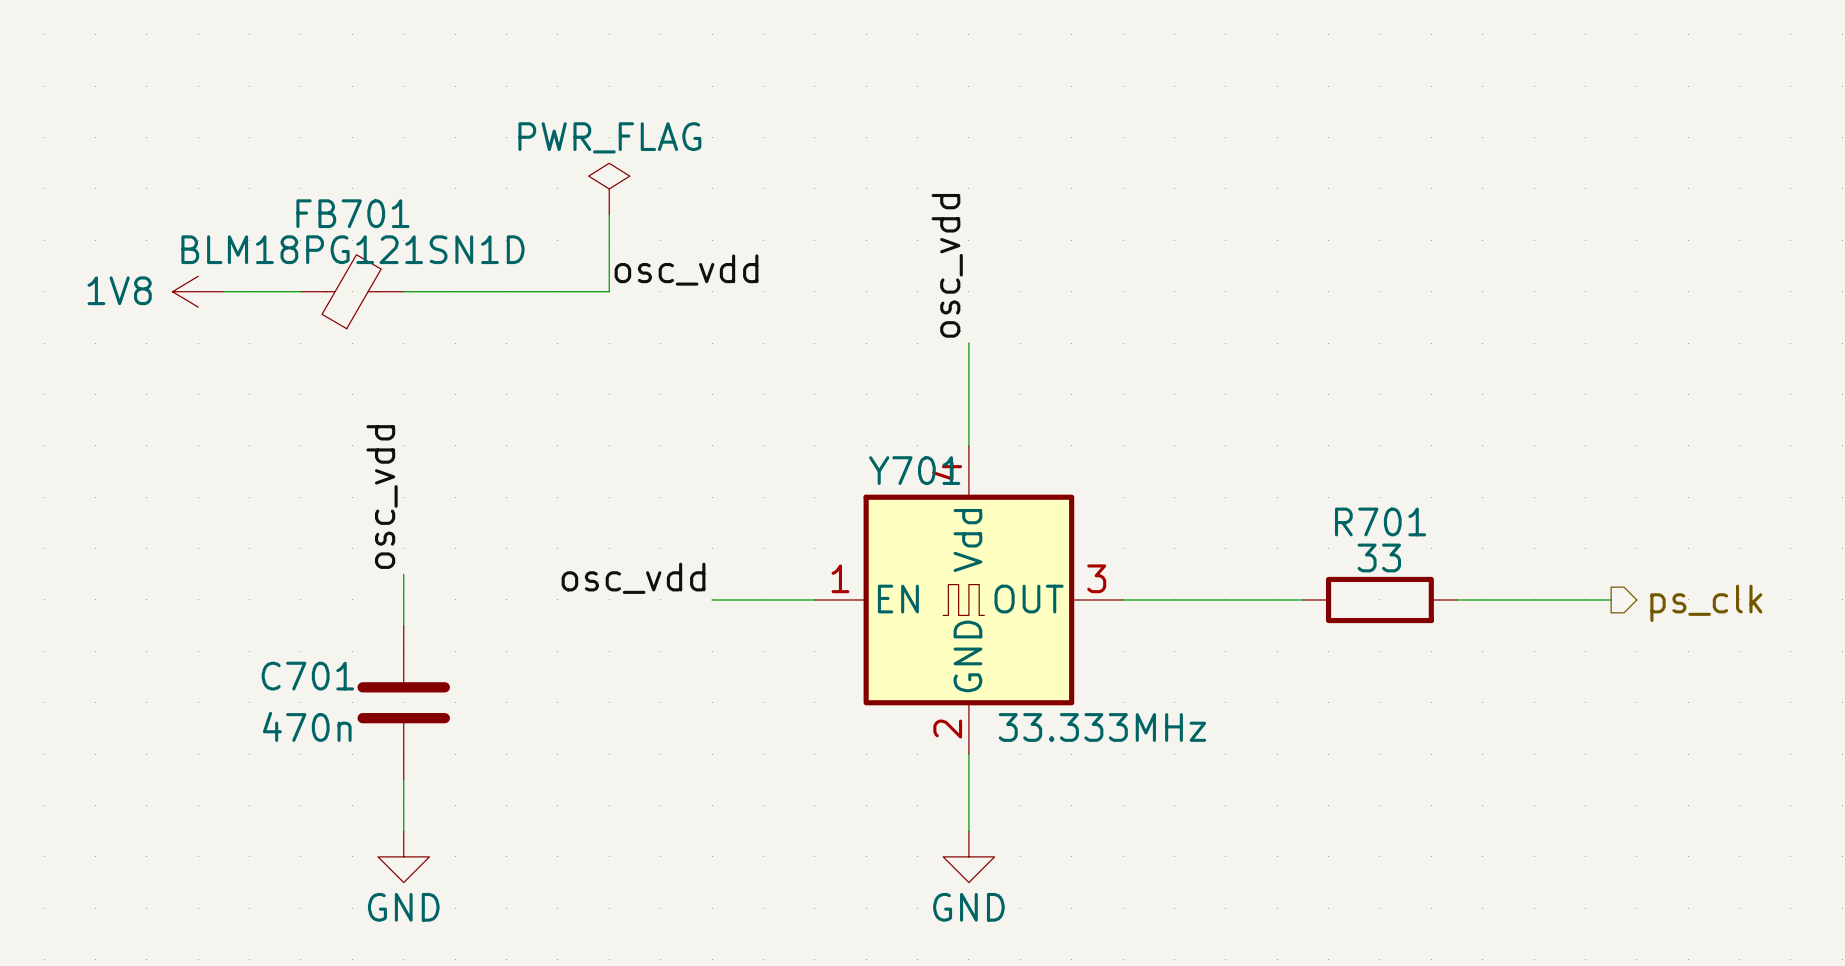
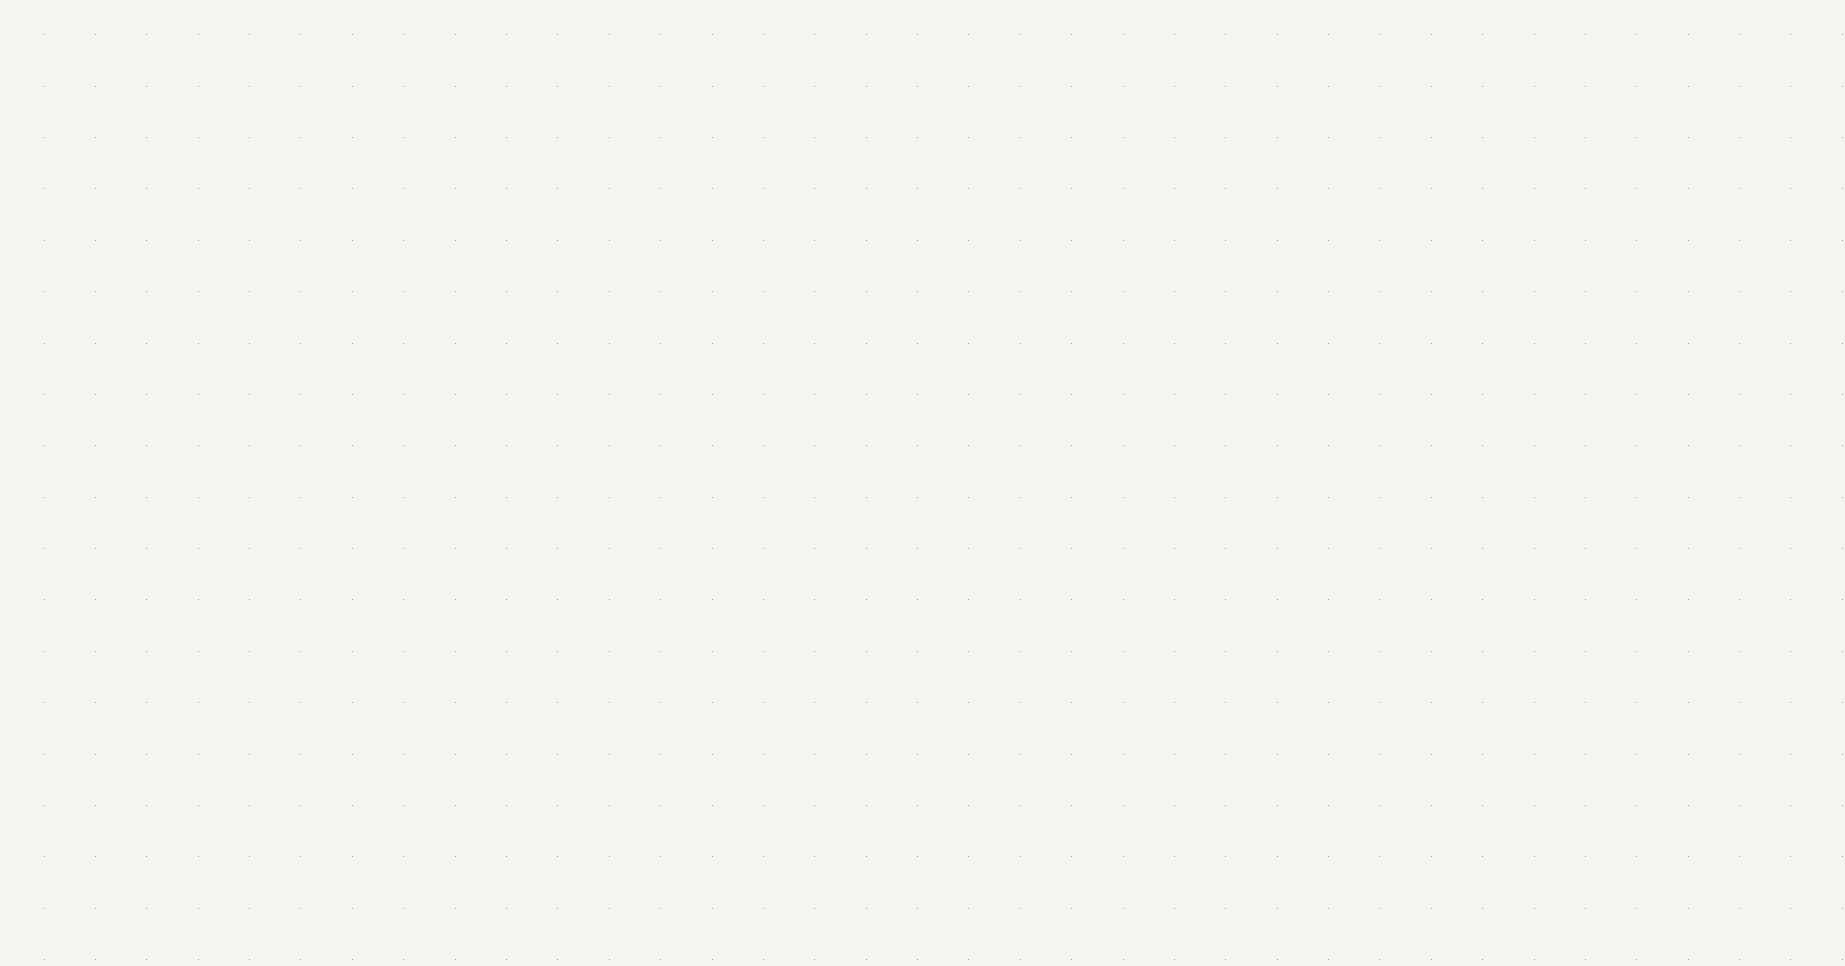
power symbol: PWR_FLAG (609, 188) -> none
wire: (609, 214) (609, 291) (403, 291) -> none
label: osc_vdd (947, 265) -> none
label: osc_vdd (686, 270) -> none
power symbol: 1V8 (198, 291) -> none
wire: (223, 291) (300, 291) -> none
FB701: BLM18PG121SN1D (352, 291) -> none
wire: (968, 343) (968, 445) -> none
label: osc_vdd (382, 497) -> none
wire: (403, 574) (403, 625) -> none
label: osc_vdd (633, 578) -> none
wire: (712, 599) (814, 599) -> none
Y701: 33.333MHz (968, 599) -> none
wire: (1123, 599) (1302, 599) -> none
R701: 33 (1379, 599) -> none
wire: (1457, 599) (1611, 599) -> none
hierarchical label: ps_clk (1706, 603) -> none
C701: 470n (403, 702) -> none
wire: (968, 754) (968, 831) -> none
wire: (403, 779) (403, 831) -> none
power symbol: GND (403, 856) -> none
power symbol: GND (968, 856) -> none

